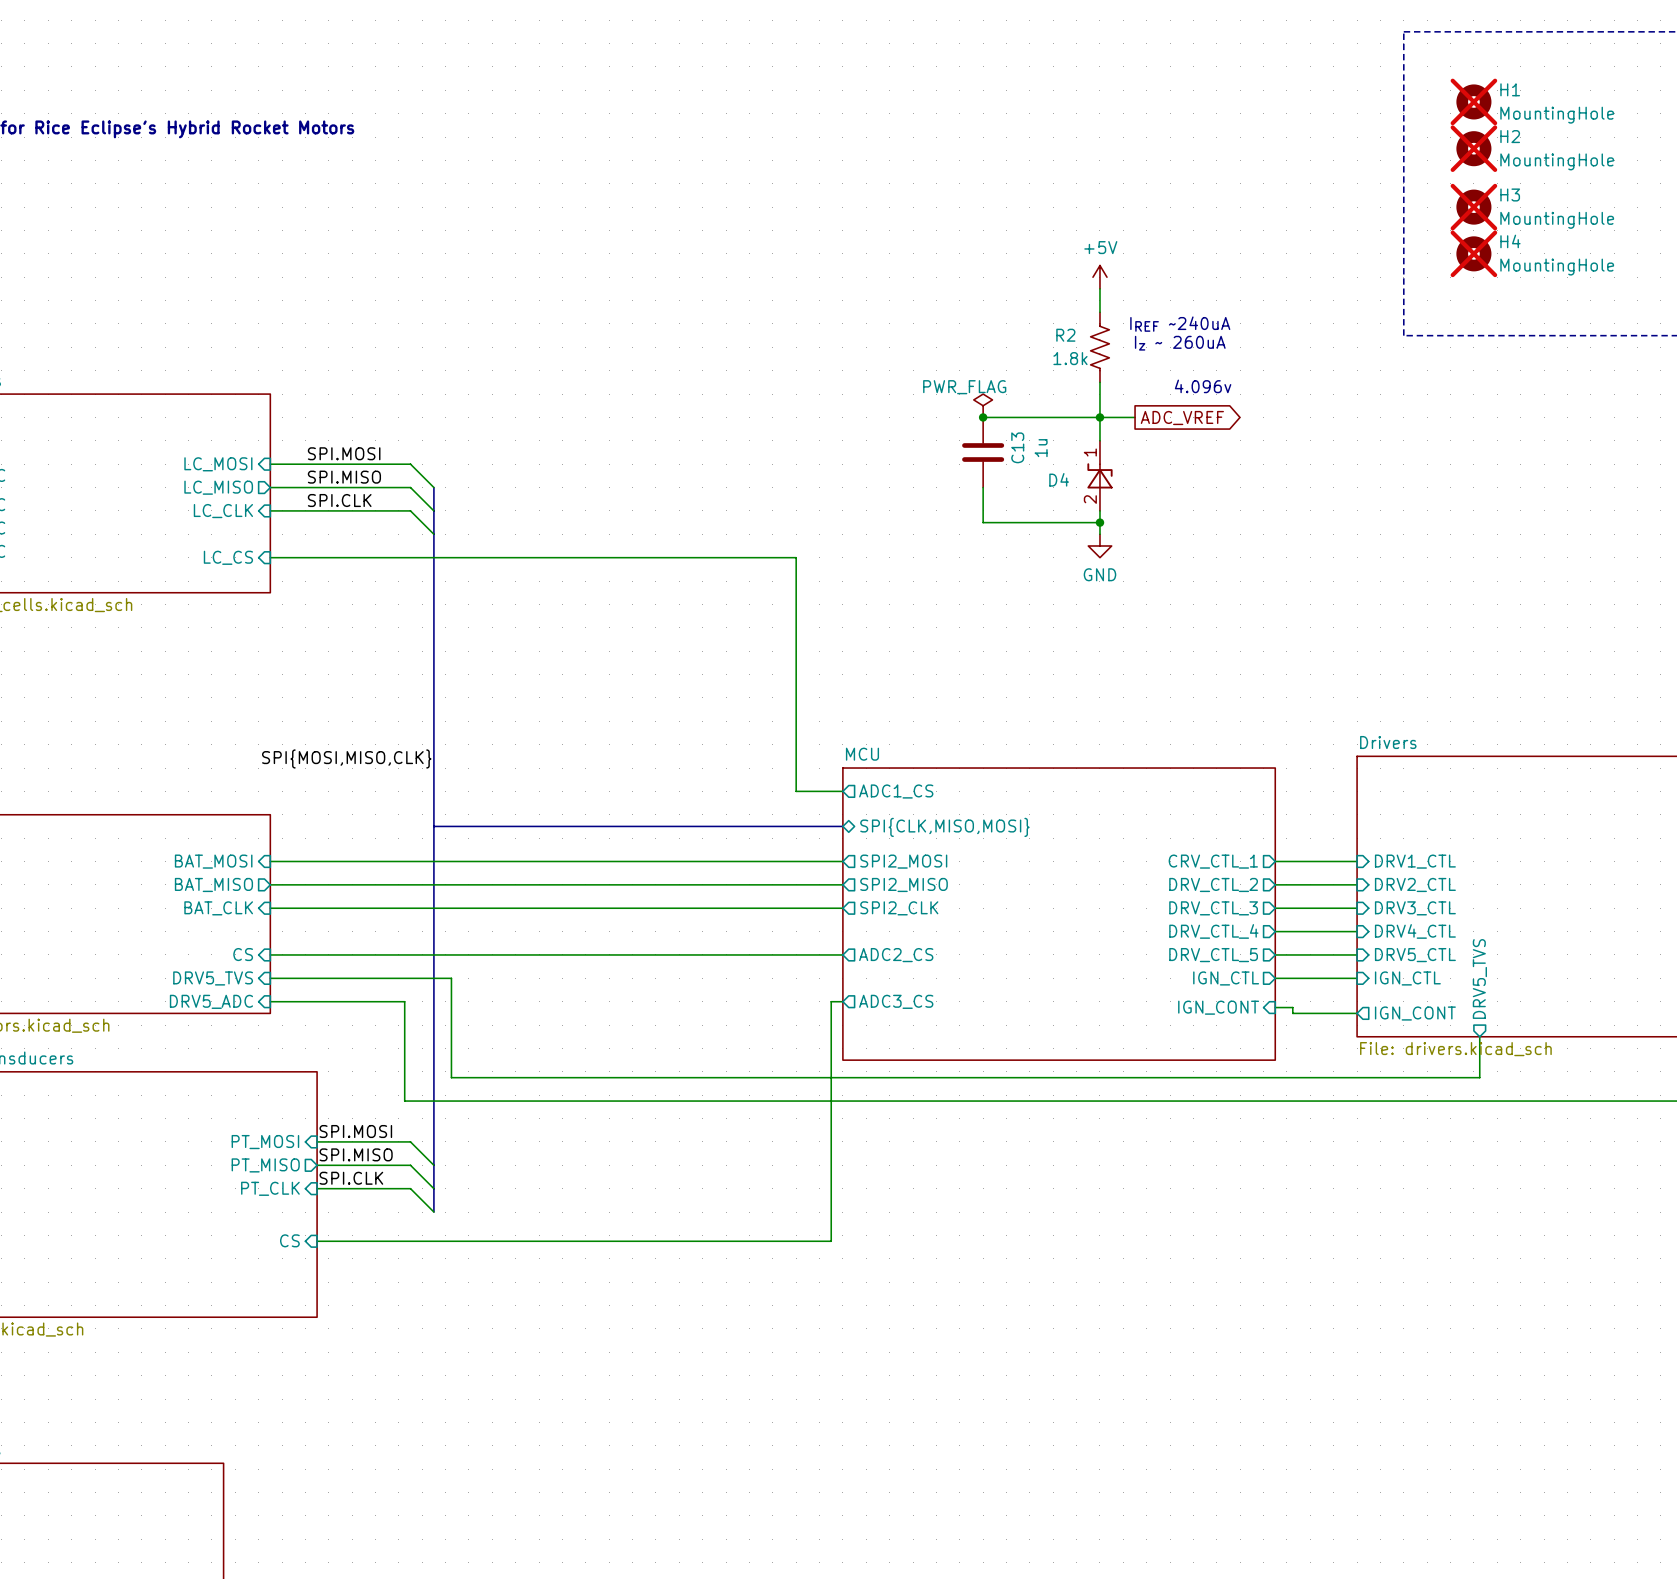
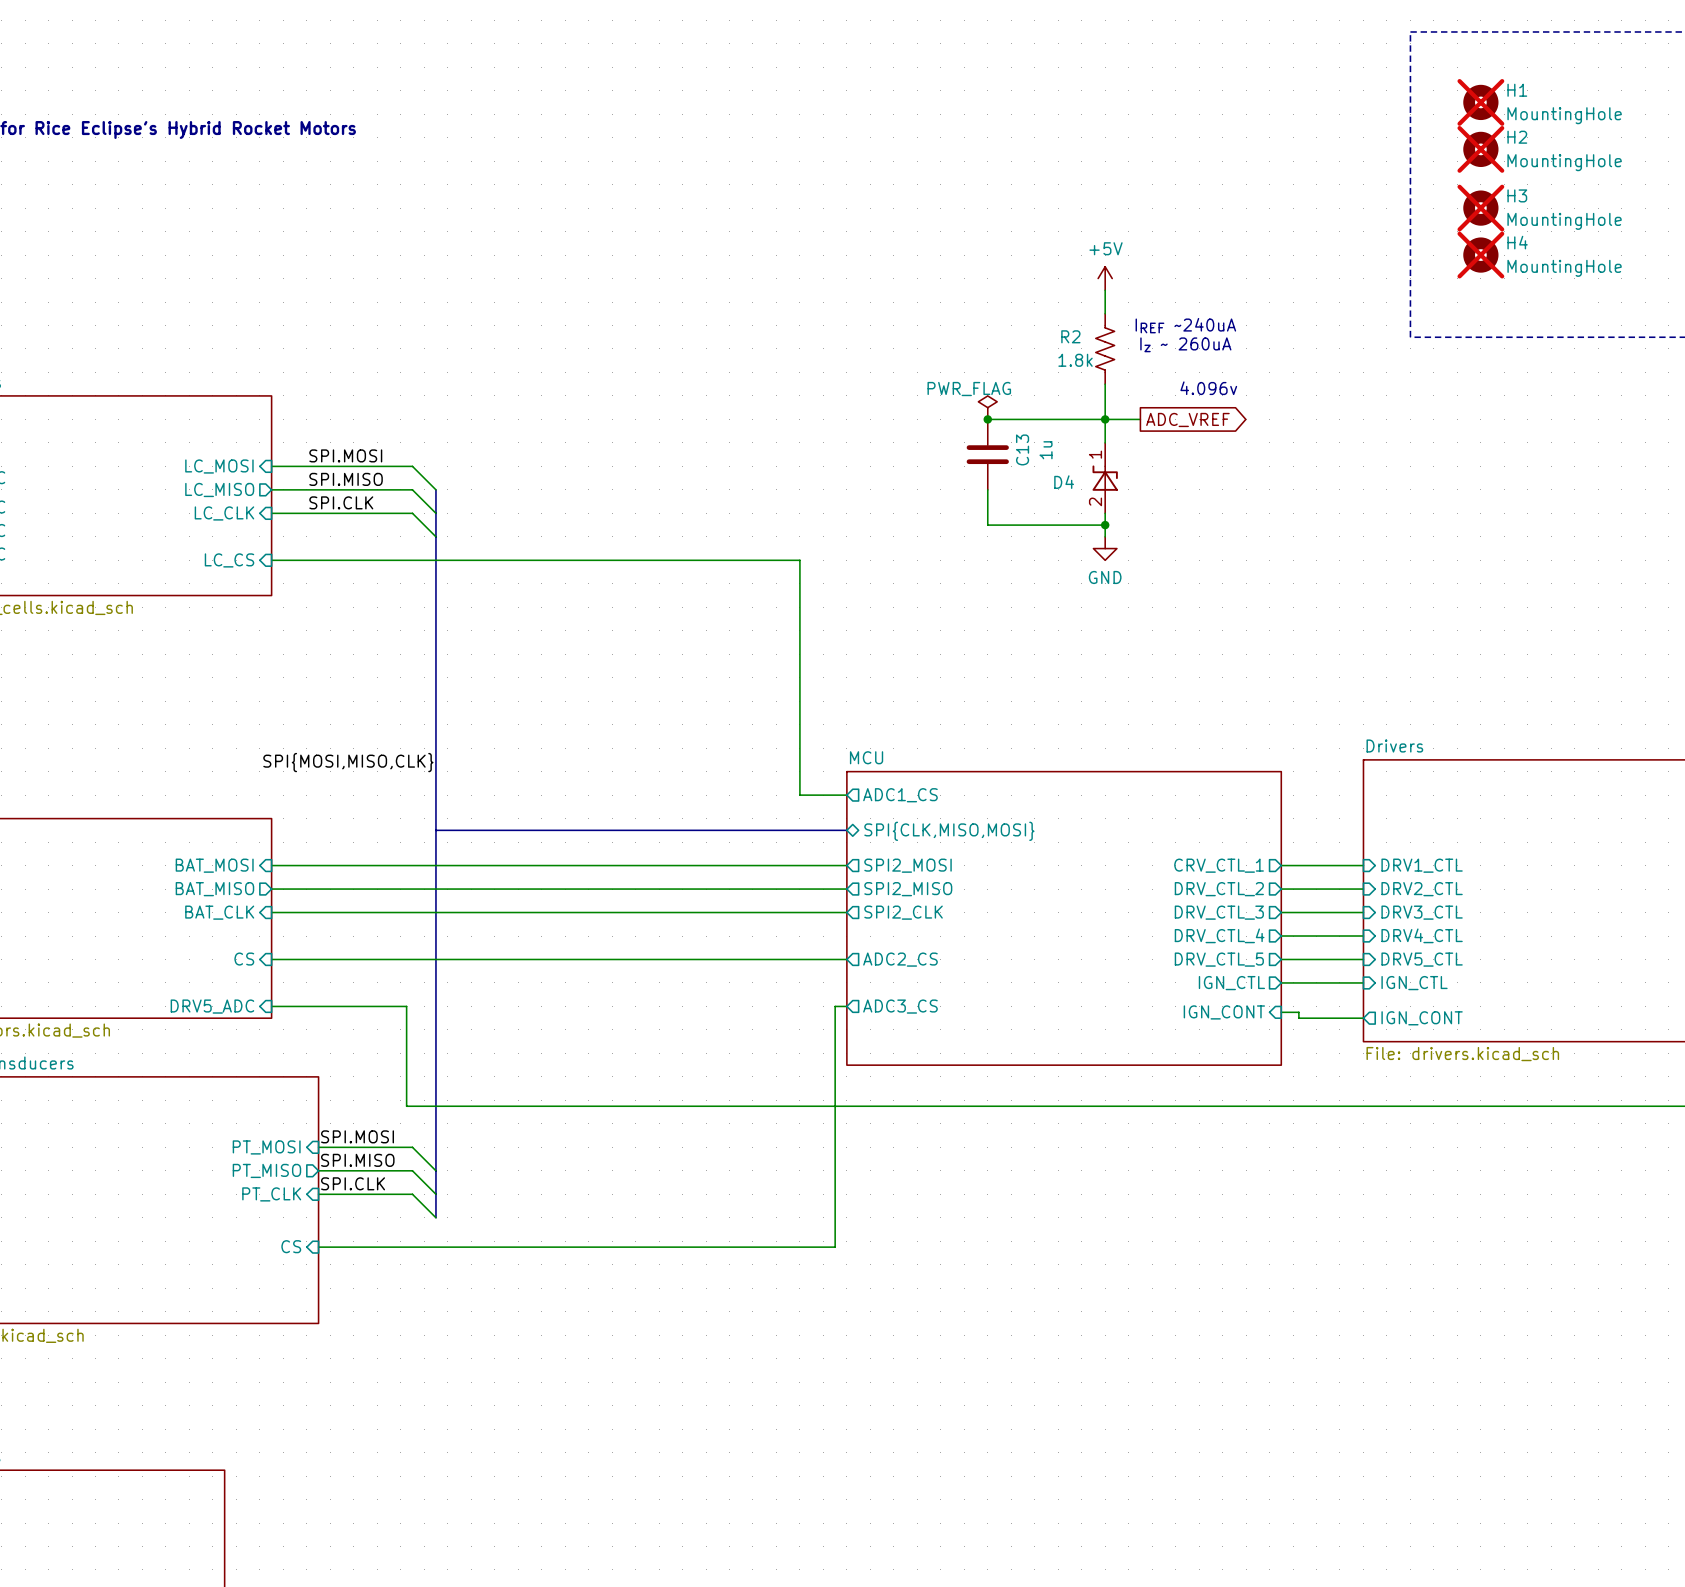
sheet pin: DRV5_TVS (213, 978) -> none
wire: (270, 978) (451, 978) (451, 1077) (1479, 1077) (1479, 1036) -> none
sheet pin: DRV5_TVS (1479, 979) -> none

